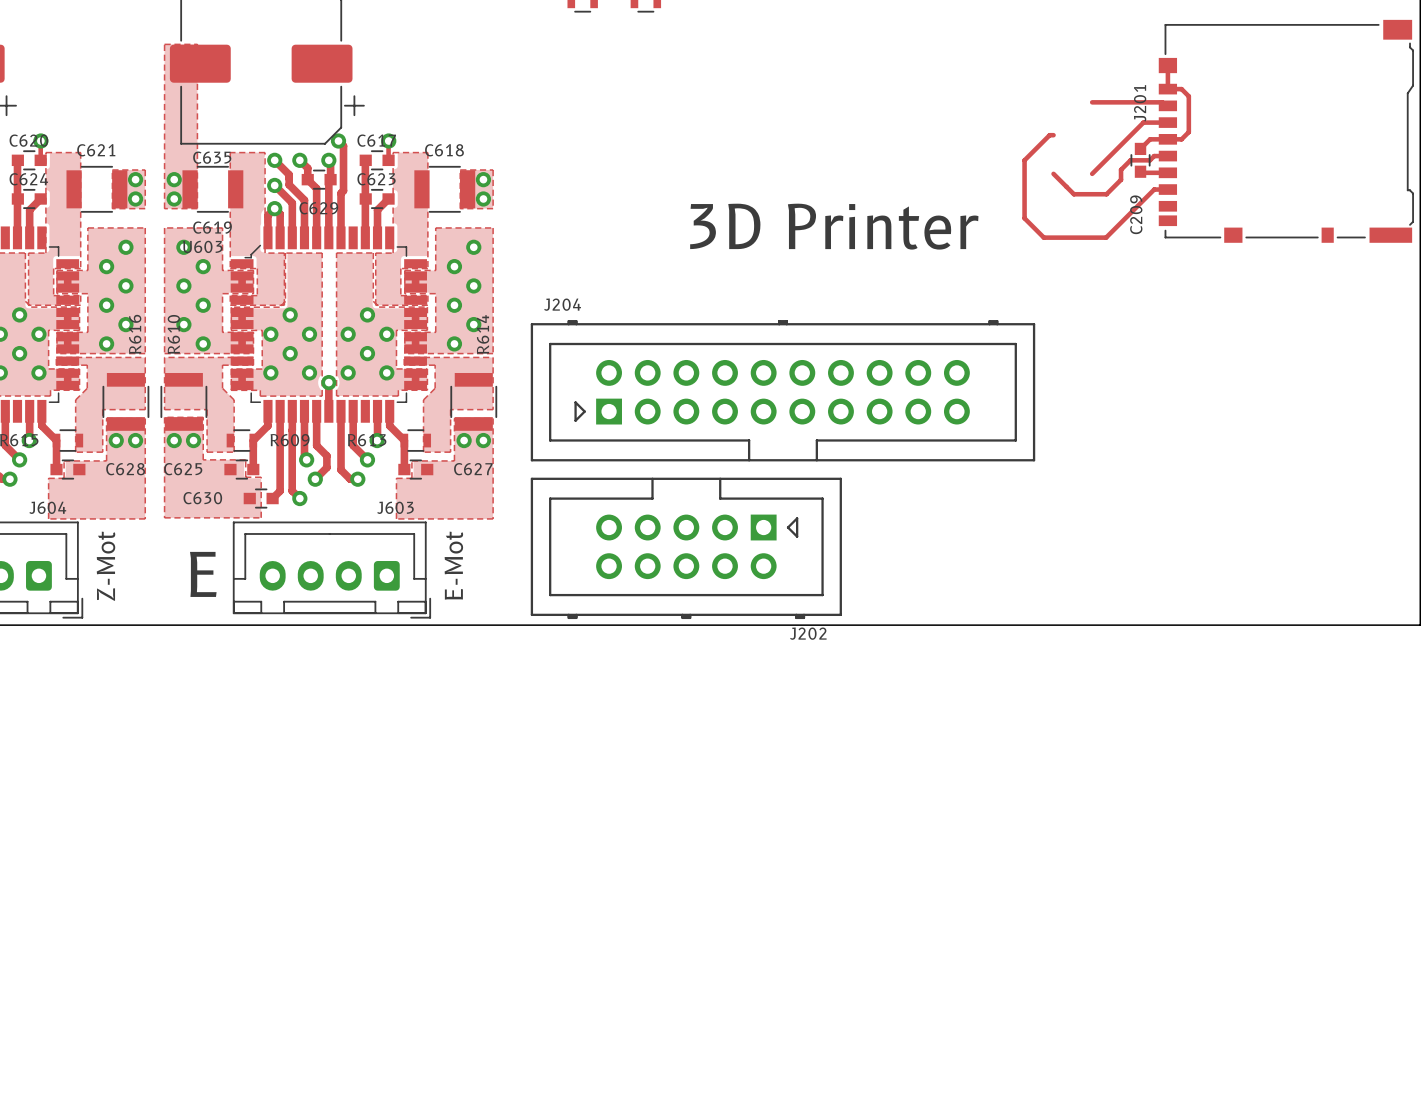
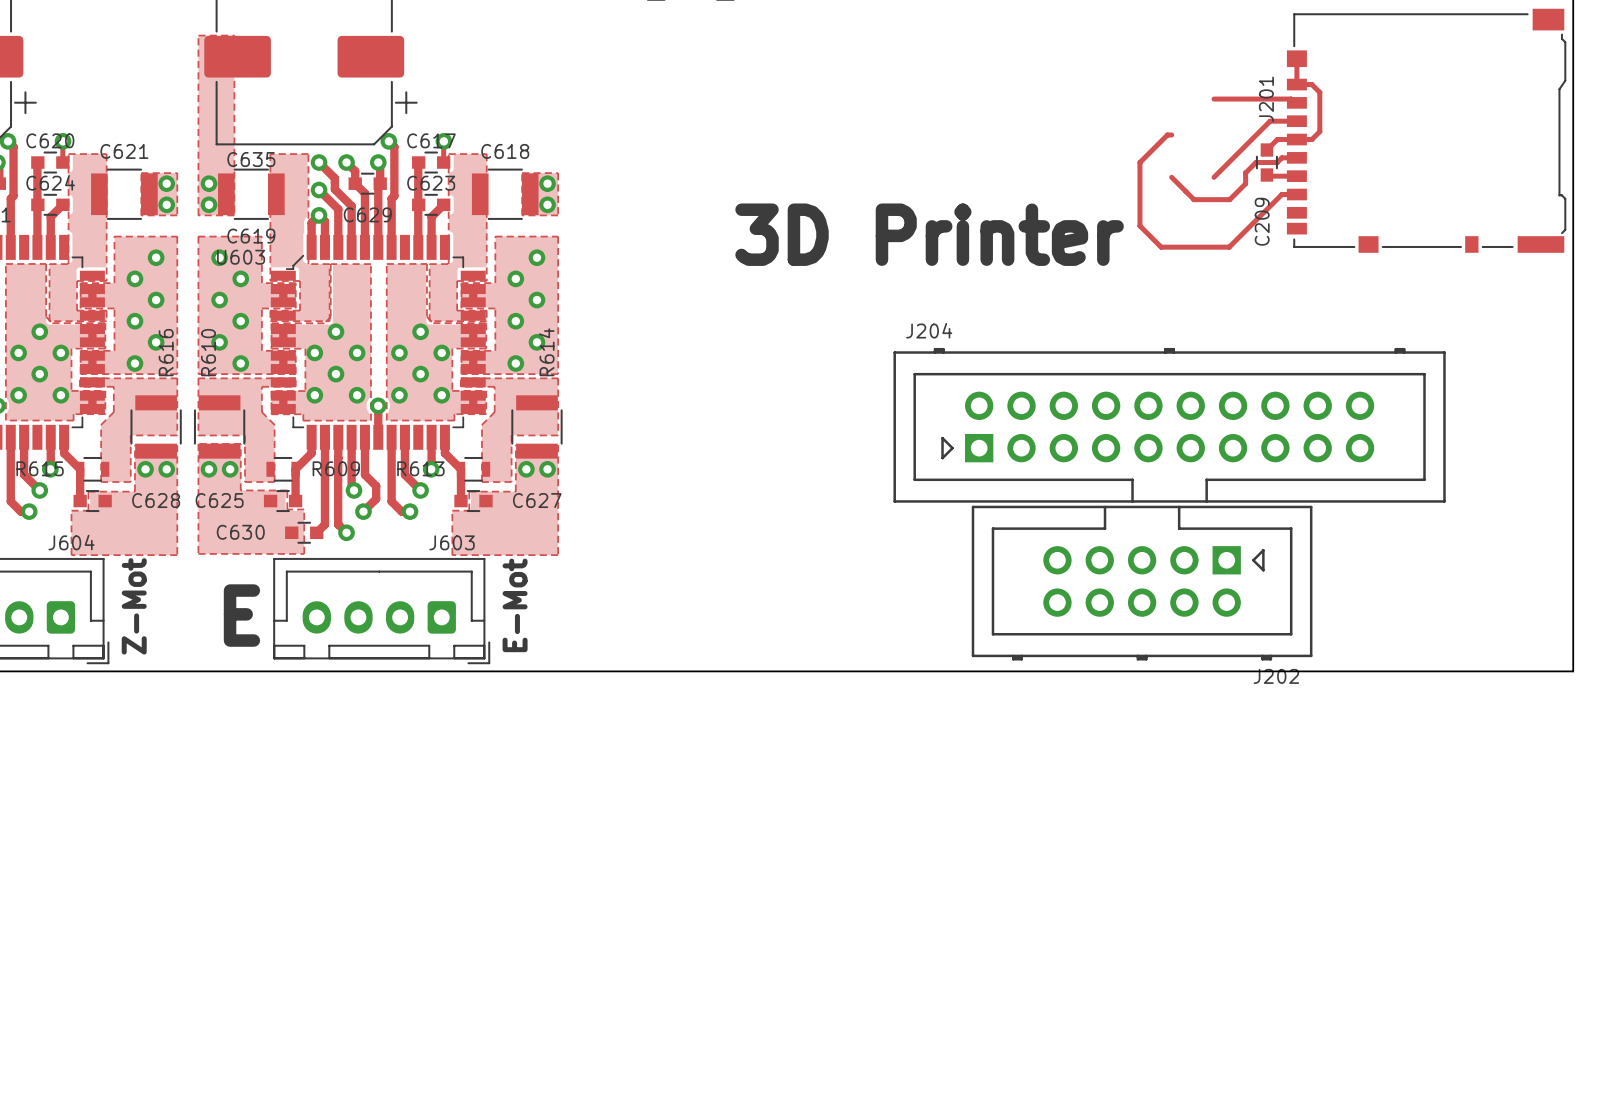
J204 position: (782, 390) -> (1169, 425)
J202 position: (686, 548) -> (1142, 583)

